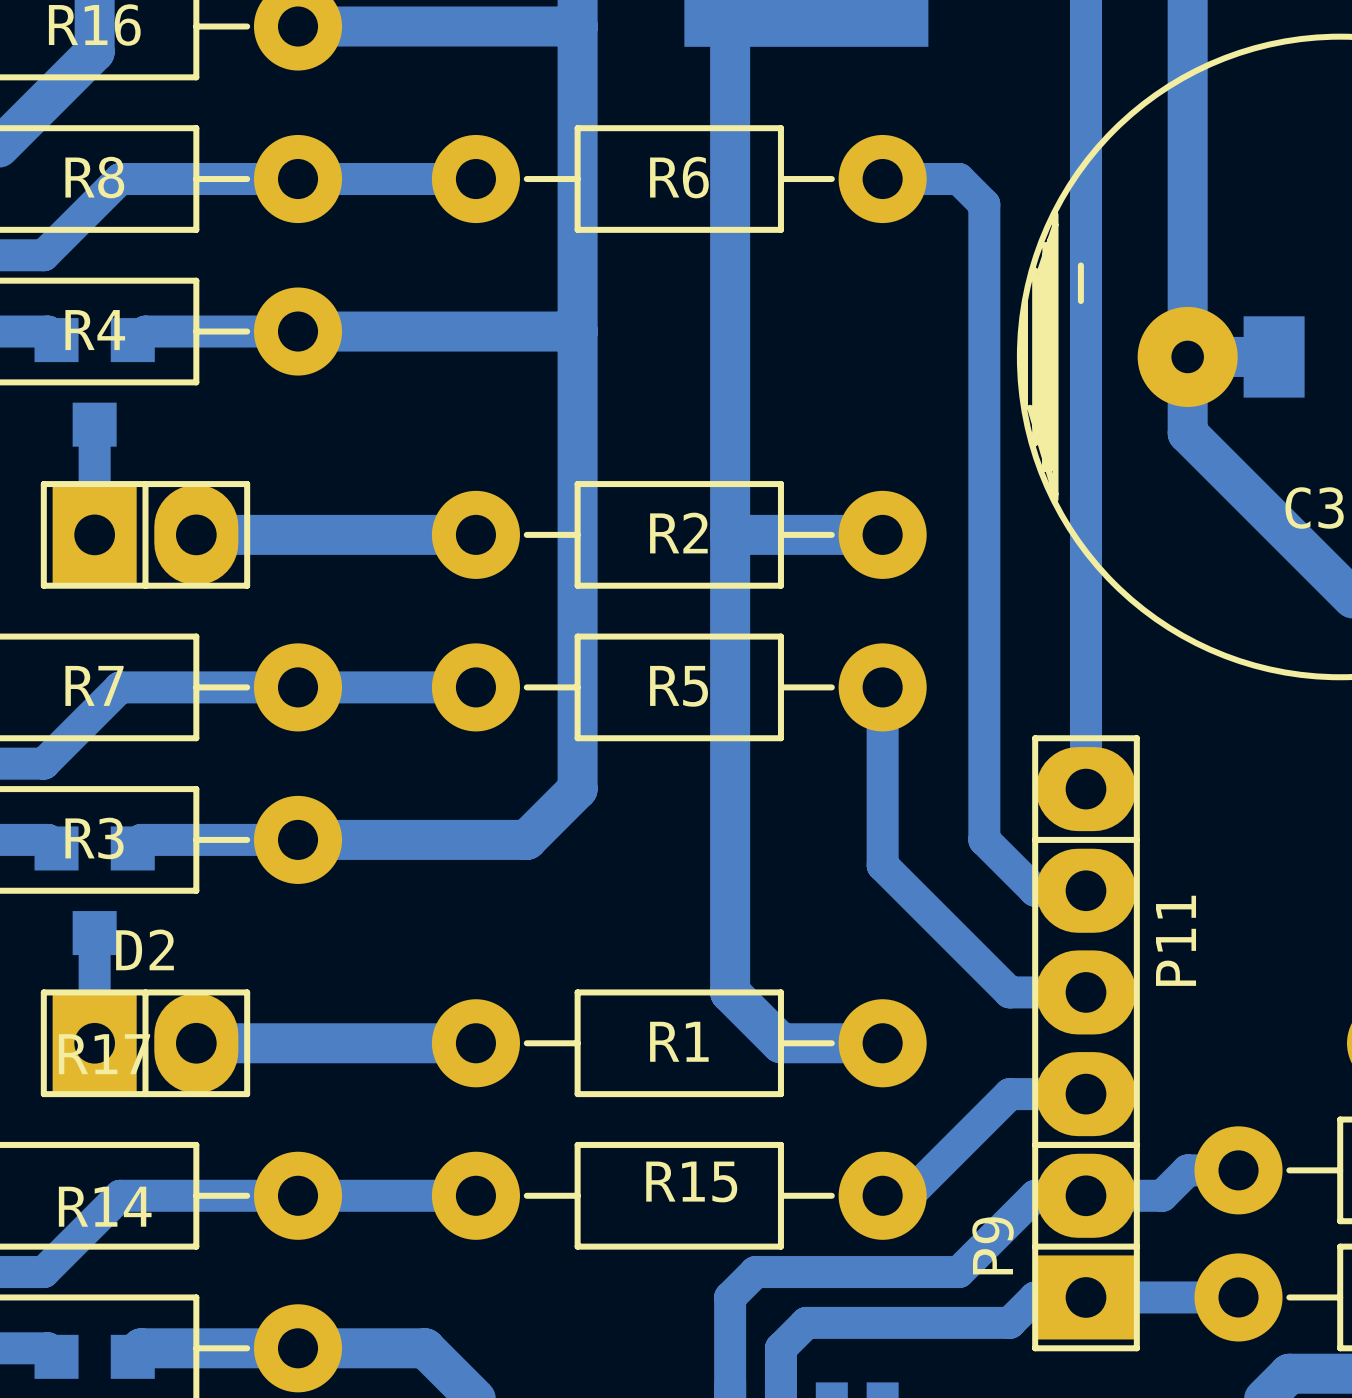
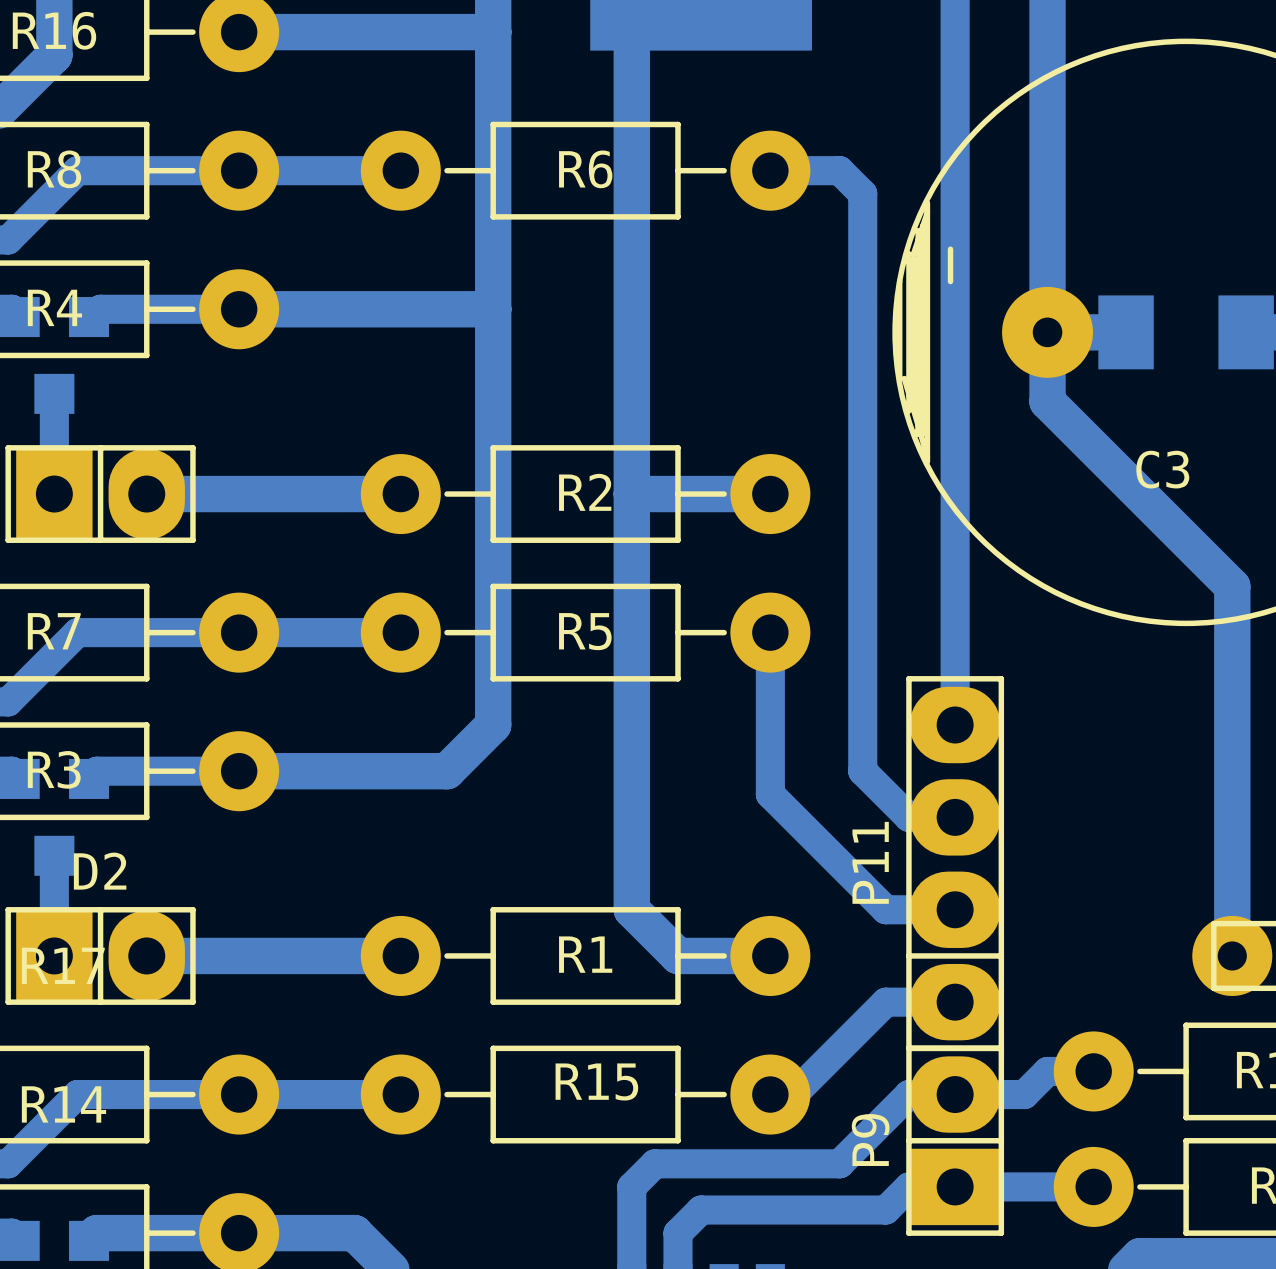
P11 rotation: 0° (1086, 941) -> 180° (955, 863)

